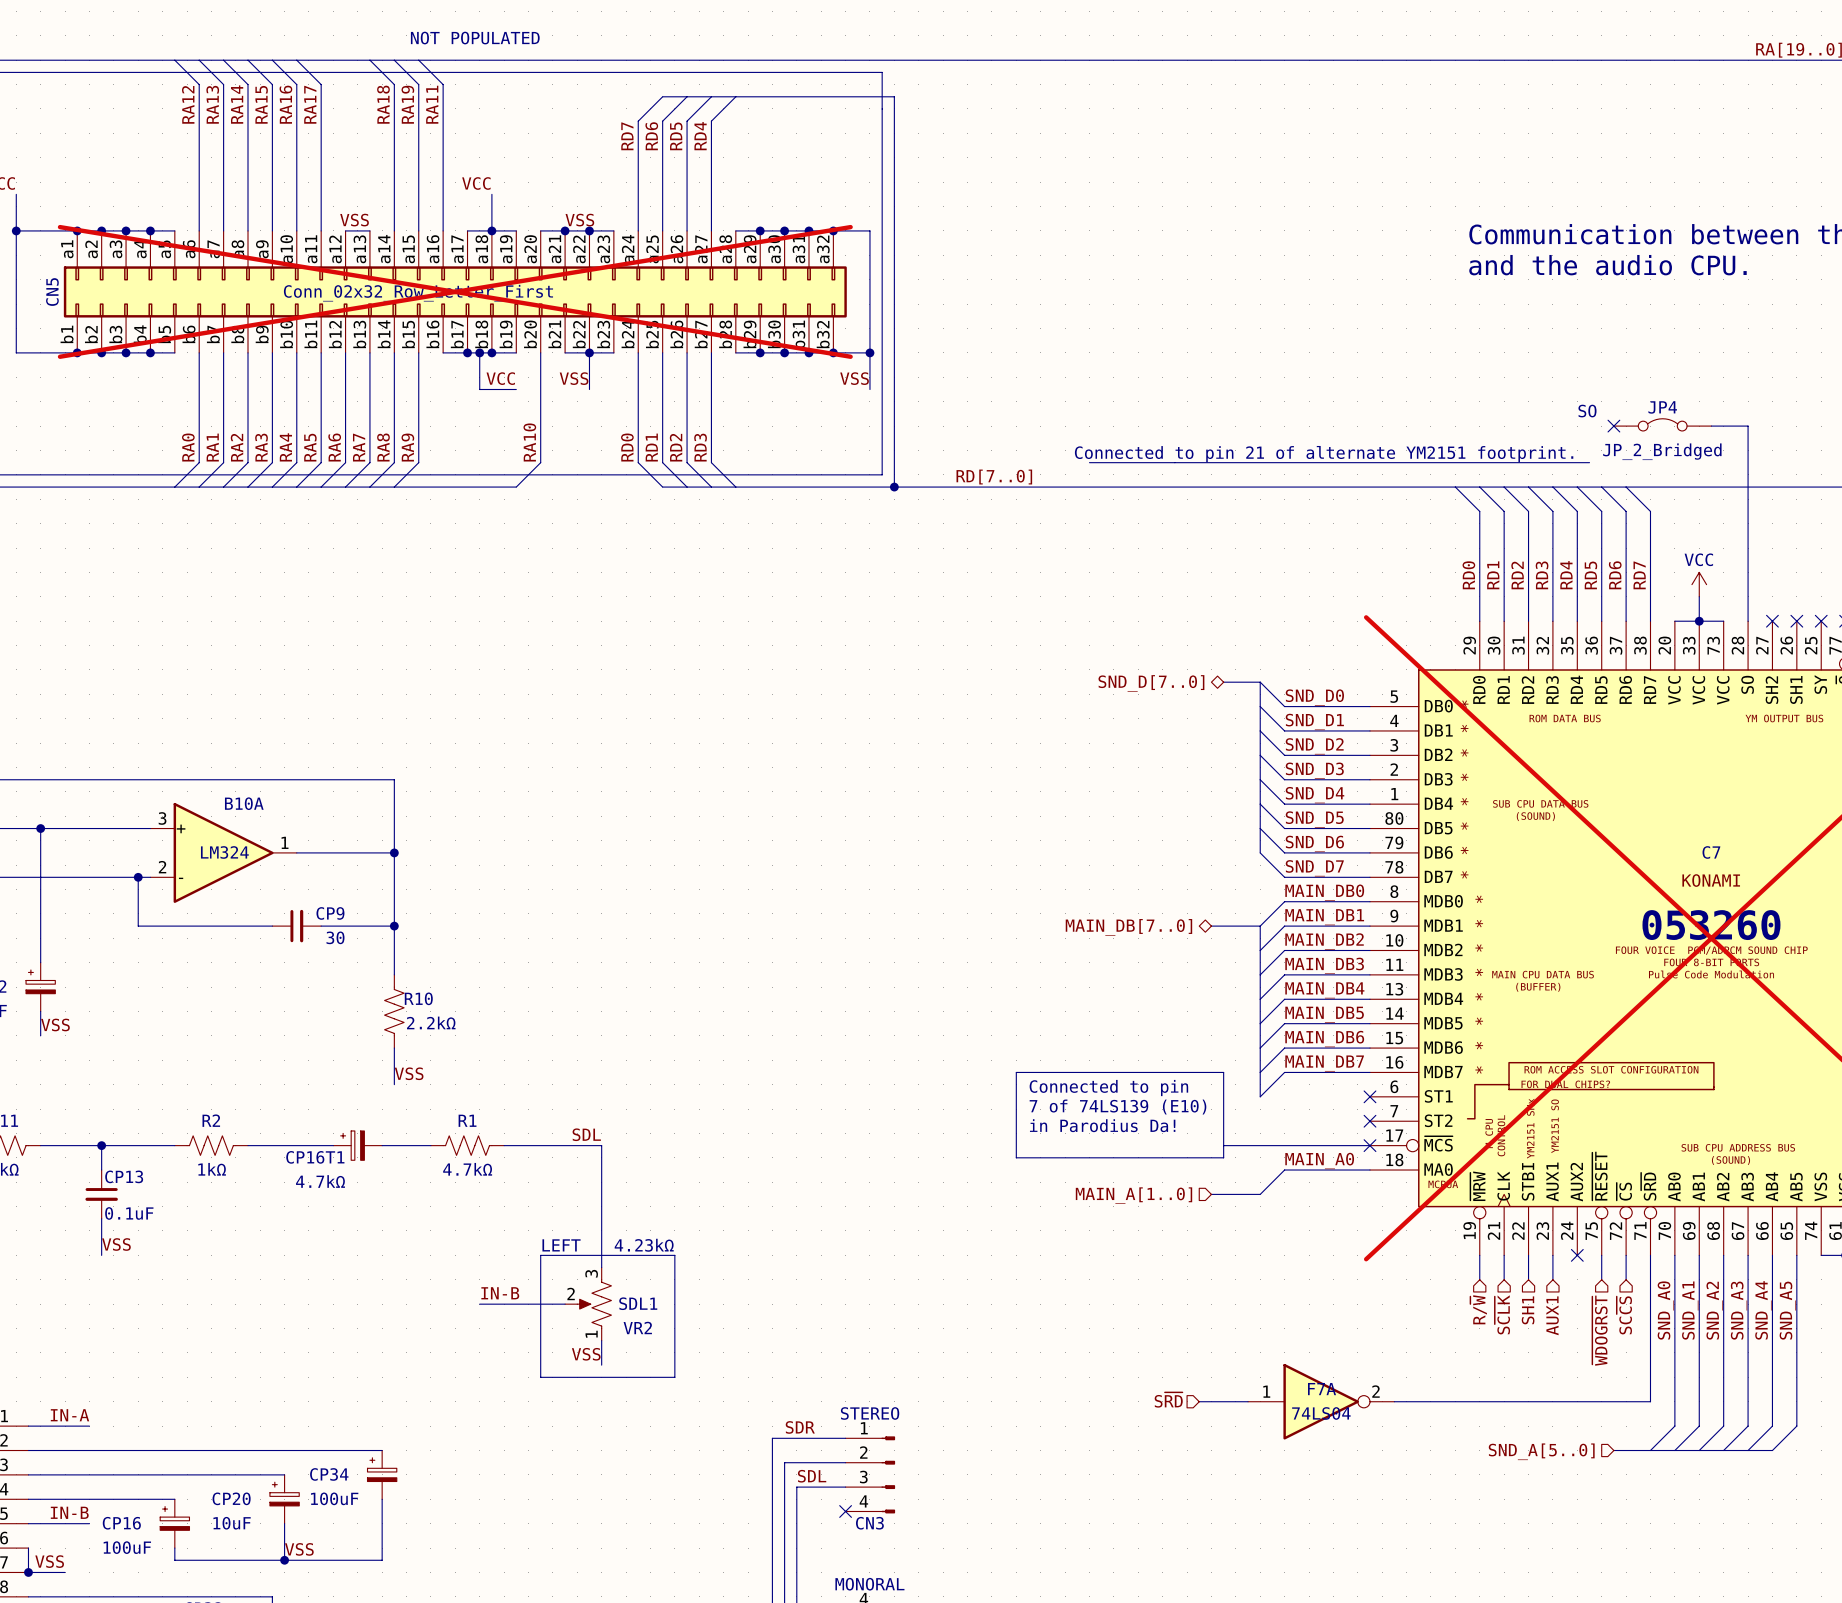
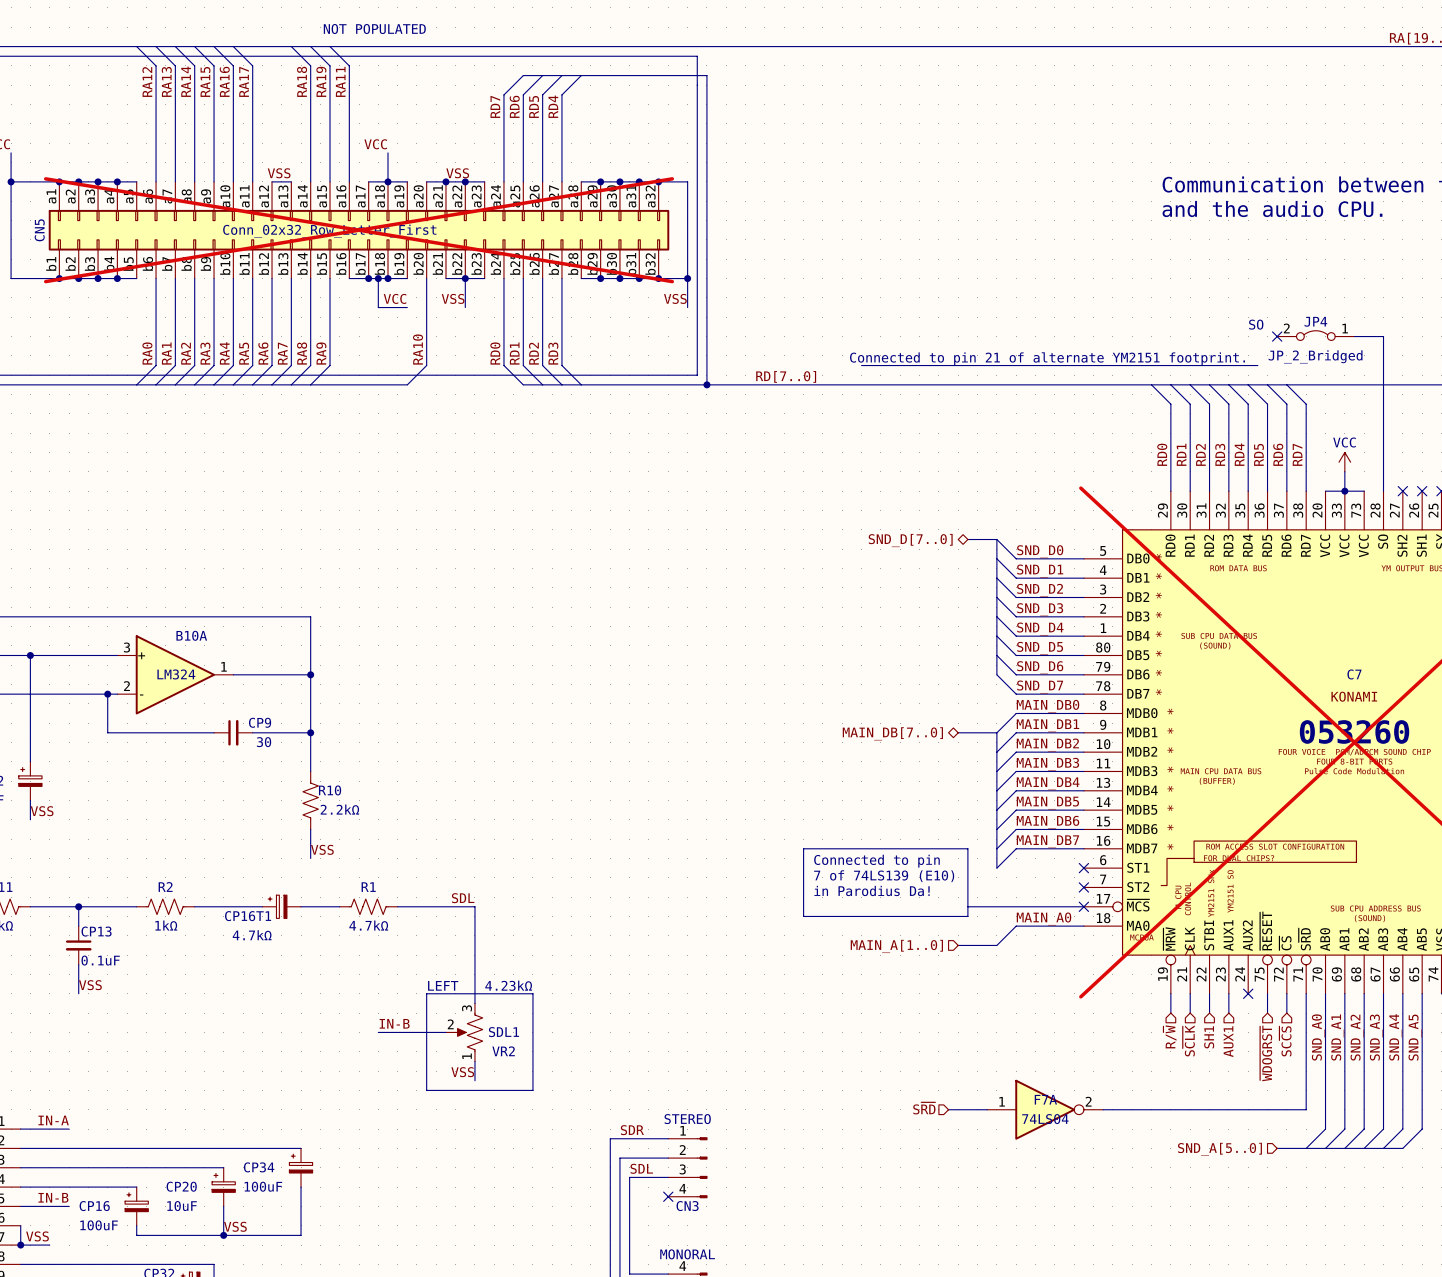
JP4 pin number: none -> 2 (1286, 328)
JP4 pin number: none -> 1 (1345, 328)

